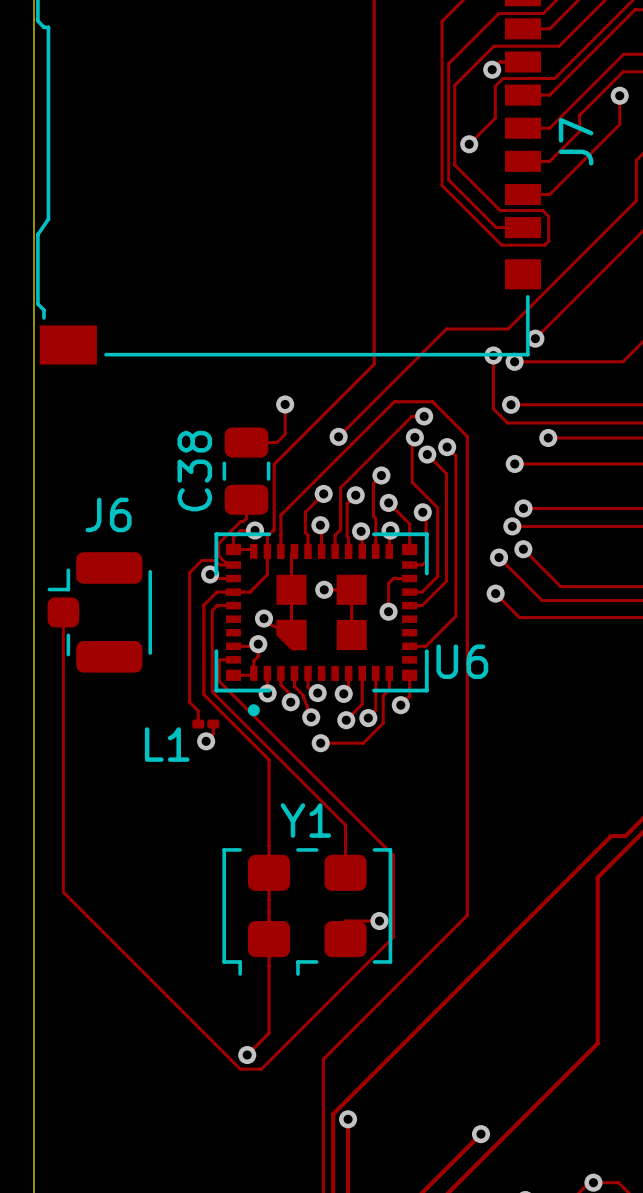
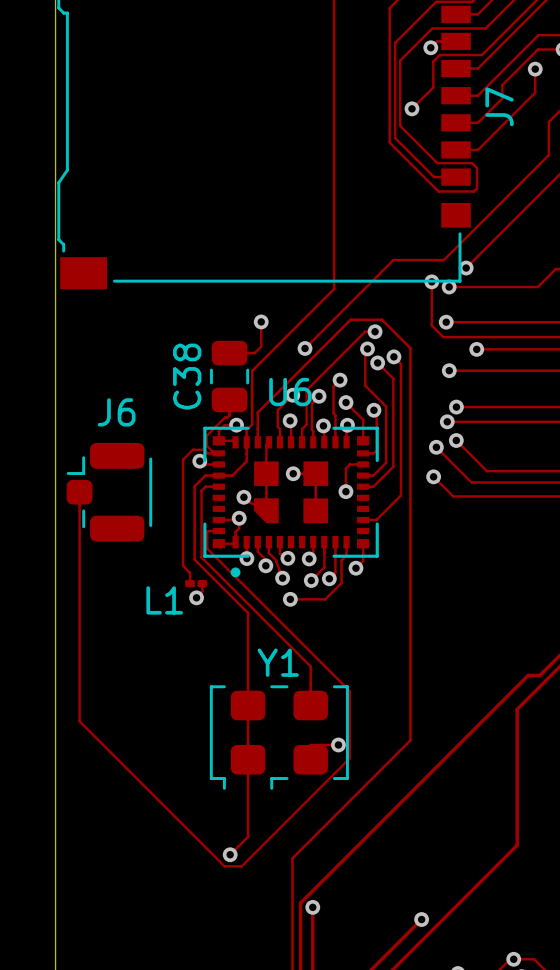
U6 name position: U6 (462, 661) -> U6 (290, 392)

